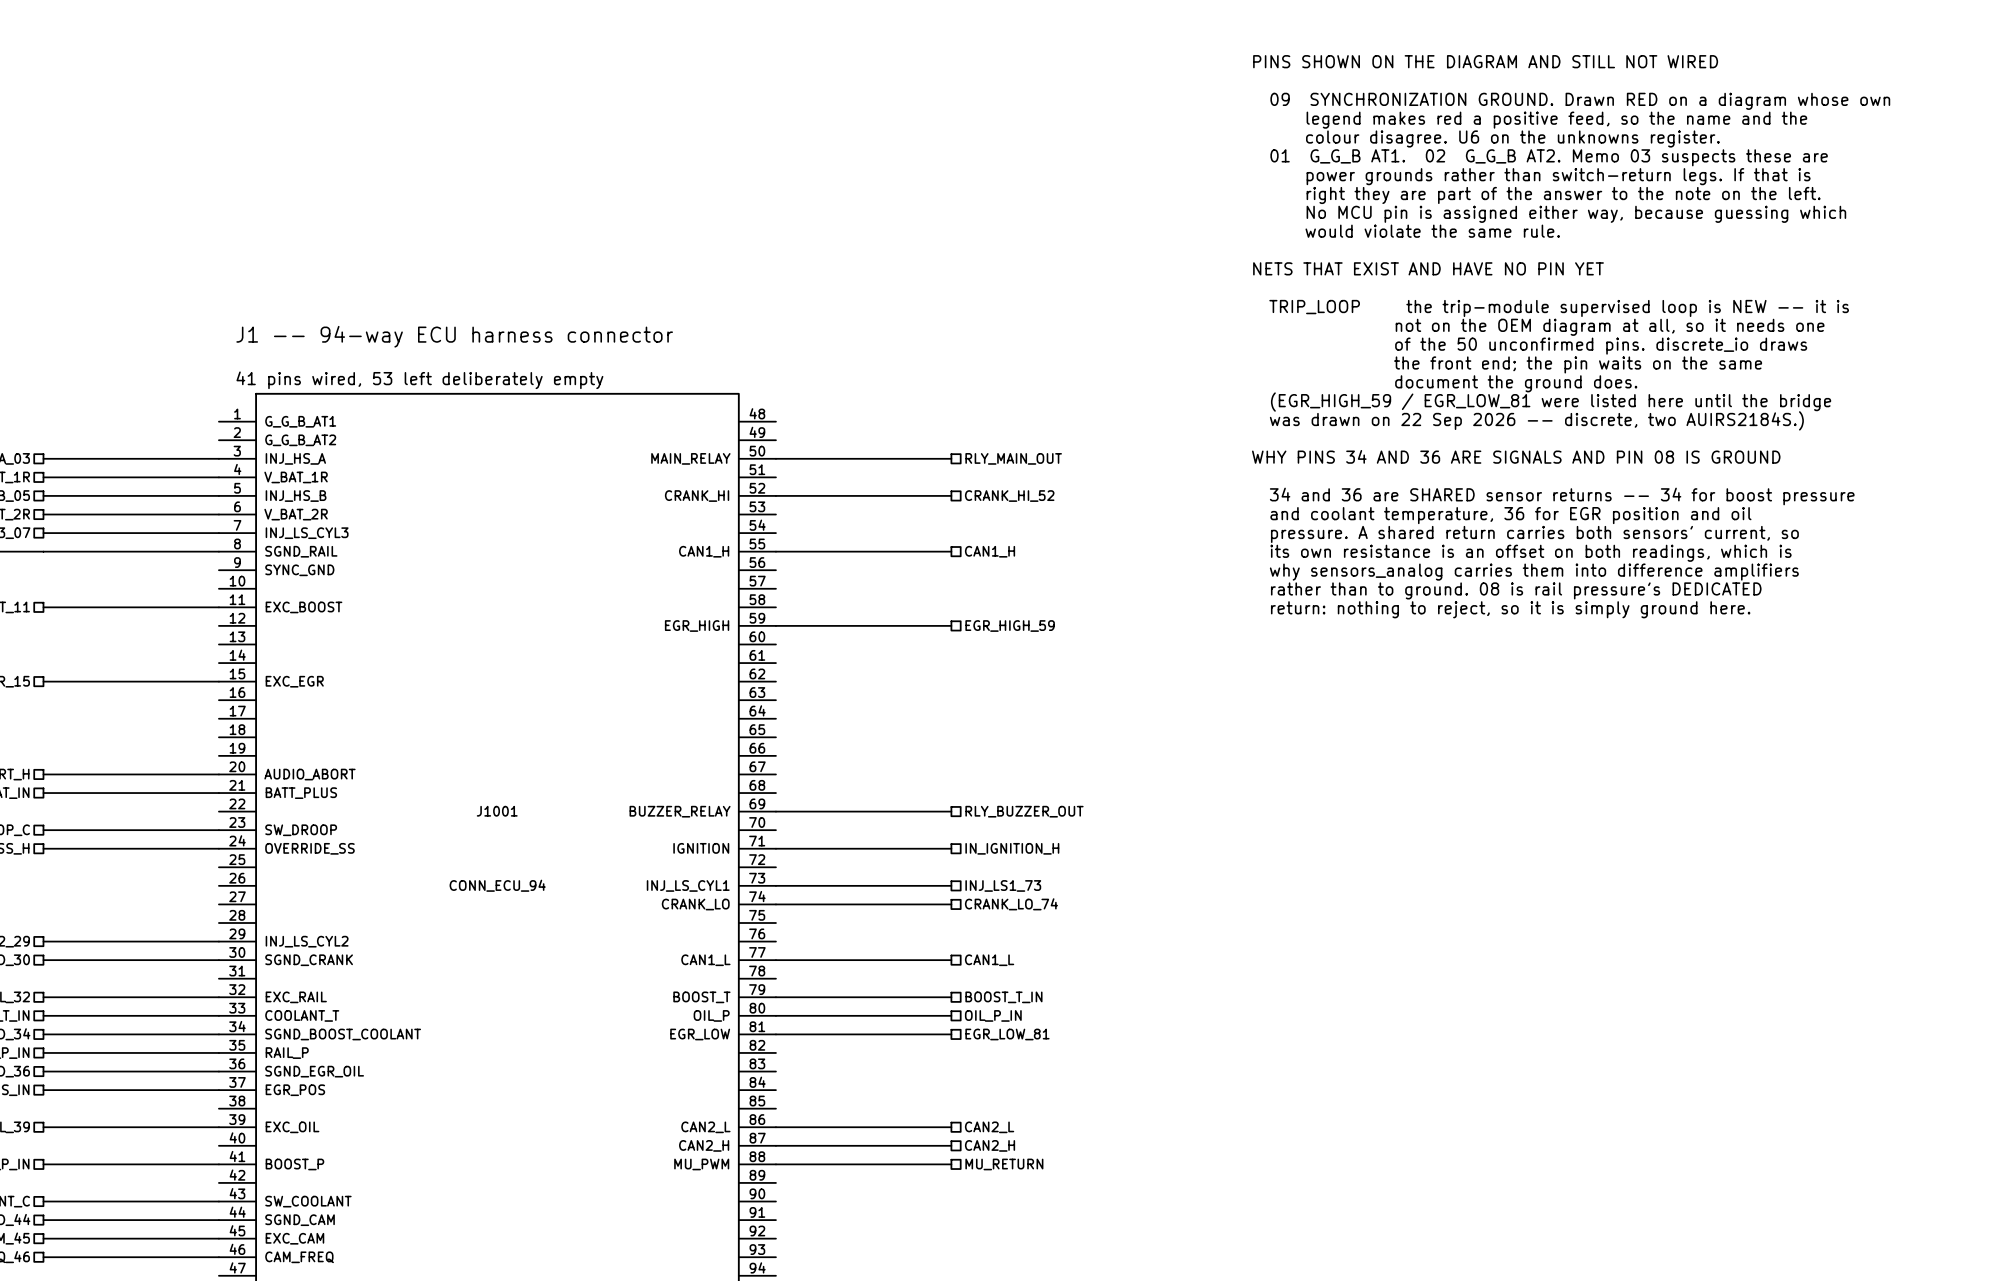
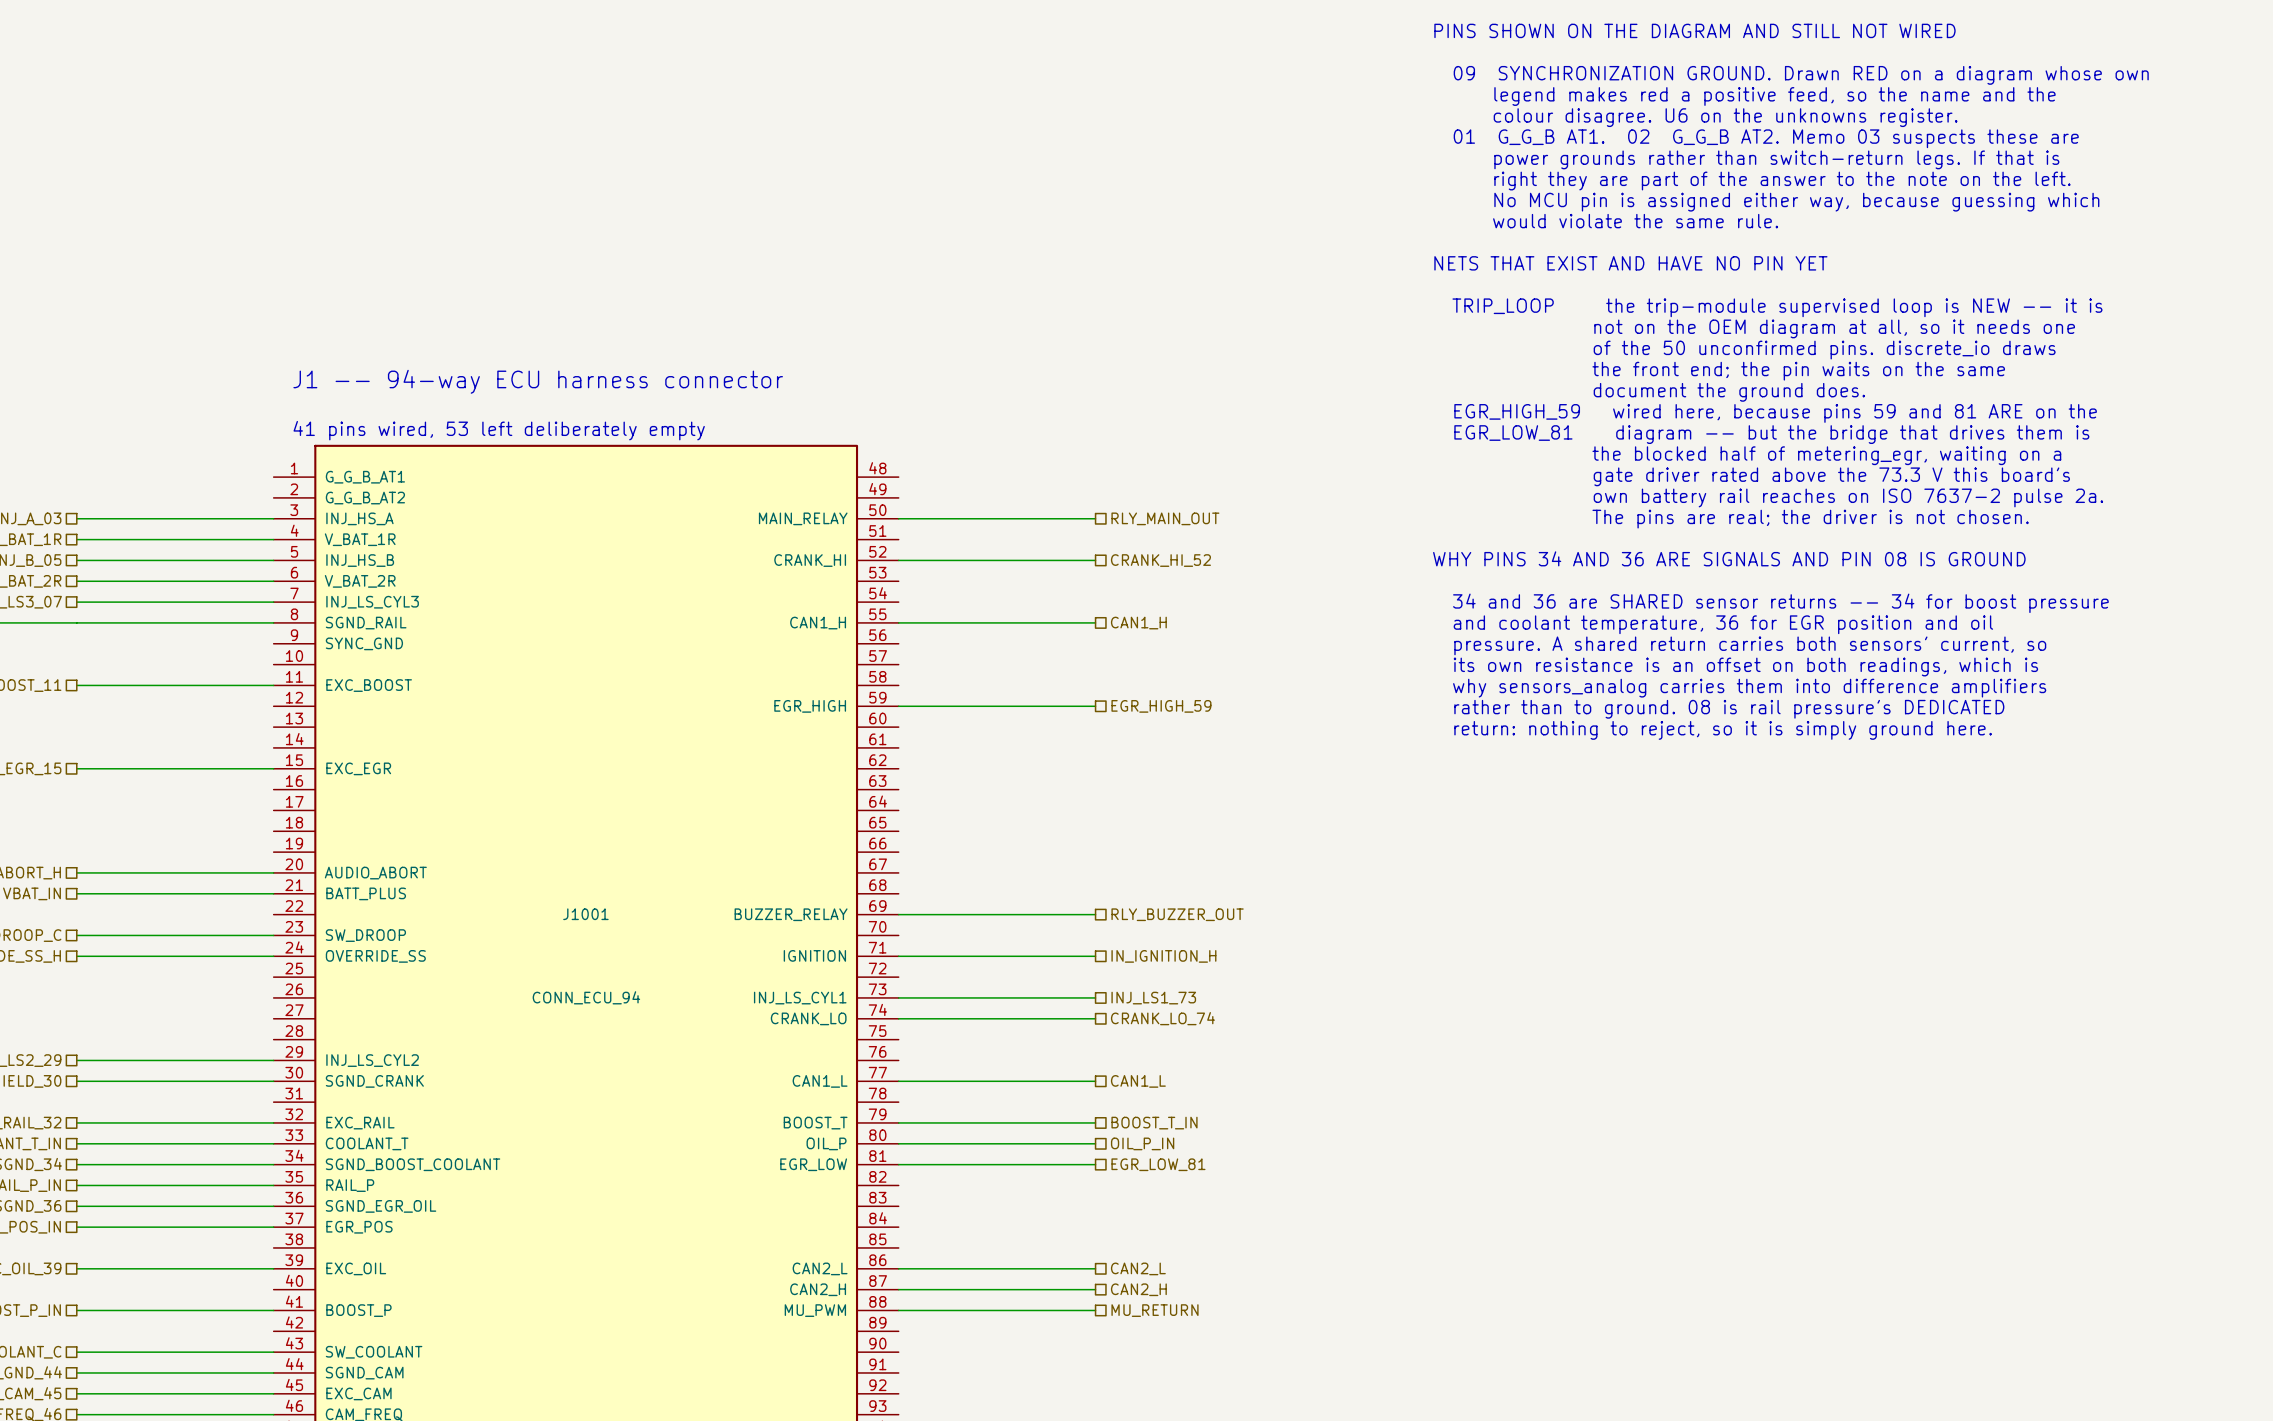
text: none -> PINS SHOWN ON THE DIAGRAM AND STILL NOT WIRED (1694, 30)
text: PINS SHOWN ON THE DIAGRAM AND STILL NOT WIRED (1485, 61) -> 09 SYNCHRONIZATION GROUND. Drawn RED on a diagram whose own (1801, 75)
text: none -> legend makes red a positive feed, so the name and the (1774, 96)
text: 09 SYNCHRONIZATION GROUND. Drawn RED on a diagram whose own (1580, 101) -> colour disagree. U6 on the unknowns register. (1725, 117)
text: legend makes red a positive feed, so the name and the (1556, 120) -> 01 G_G_B AT1. 02 G_G_B AT2. Memo 03 suspects these are (1766, 138)
text: colour disagree. U6 on the unknowns register. (1512, 138) -> power grounds rather than switch-return legs. If that is (1776, 159)
text: 01 G_G_B AT1. 02 G_G_B AT2. Memo 03 suspects these are (1549, 157) -> right they are part of the answer to the note on the left. (1782, 181)
text: power grounds rather than switch-return legs. If that is (1558, 176) -> No MCU pin is assigned either way, because guessing which (1796, 202)
text: right they are part of the answer to the note on the left. (1563, 195) -> would violate the same rule. (1635, 221)
text: No MCU pin is assigned either way, because guessing which (1576, 214) -> none
text: would violate the same rule. (1432, 231) -> NETS THAT EXIST AND HAVE NO PIN YET (1630, 263)
text: NETS THAT EXIST AND HAVE NO PIN YET (1428, 268) -> TRIP_LOOP the trip-module supervised loop is NEW -- it is (1777, 307)
text: none -> not on the OEM diagram at all, so it needs one (1834, 328)
text: TRIP_LOOP the trip-module supervised loop is NEW -- it is (1559, 308) -> of the 50 unconfirmed pins. discrete_io draws (1824, 350)
text: not on the OEM diagram at all, so it needs one (1610, 327) -> the front end; the pin waits on the same (1798, 371)
text: of the 50 unconfirmed pins. discrete_io draws (1601, 346) -> document the ground does. (1729, 392)
text: the front end; the pin waits on the same (1578, 364) -> EGR_HIGH_59 wired here, because pins 59 and 81 ARE on the (1775, 413)
text: document the ground does. (1516, 383) -> EGR_LOW_81 diagram -- but the bridge that drives them is (1771, 434)
text: (EGR_HIGH_59 / EGR_LOW_81 were listed here until the bridge (1551, 402) -> the blocked half of metering_egr, waiting on a (1826, 455)
text: was drawn on 22 Sep 2026 -- discrete, two AUIRS2184S.) (1536, 420) -> gate driver rated above the 73.3 V this board's (1831, 476)
text: none -> own battery rail reaches on ISO 7637-2 pulse 2a. (1848, 497)
text: WHY PINS 34 AND 36 ARE SIGNALS AND PIN 08 IS GROUND (1516, 456) -> The pins are real; the driver is not chosen. (1810, 519)
text: 34 and 36 are SHARED sensor returns -- 34 for boost pressure (1562, 496) -> WHY PINS 34 AND 36 ARE SIGNALS AND PIN 08 IS GROUND (1729, 558)
text: and coolant temperature, 36 for EGR position and oil (1510, 515) -> none
text: pressure. A shared return carries both sensors' current, so (1534, 534) -> 34 and 36 are SHARED sensor returns -- 34 for boost pressure (1780, 603)
text: its own resistance is an offset on both readings, which is (1531, 553) -> and coolant temperature, 36 for EGR position and oil (1723, 624)
text: why sensors_analog carries them into difference amplifiers (1534, 572) -> pressure. A shared return carries both sensors' current, so (1750, 645)
text: rather than to ground. 08 is rail pressure's DEDICATED (1516, 590) -> its own resistance is an offset on both readings, which is (1745, 667)
text: return: nothing to reject, so it is simply ground here. (1510, 609) -> why sensors_analog carries them into difference amplifiers (1749, 688)
text: none -> rather than to ground. 08 is rail pressure's DEDICATED (1729, 709)
text: none -> return: nothing to reject, so it is simply ground here. (1723, 730)

